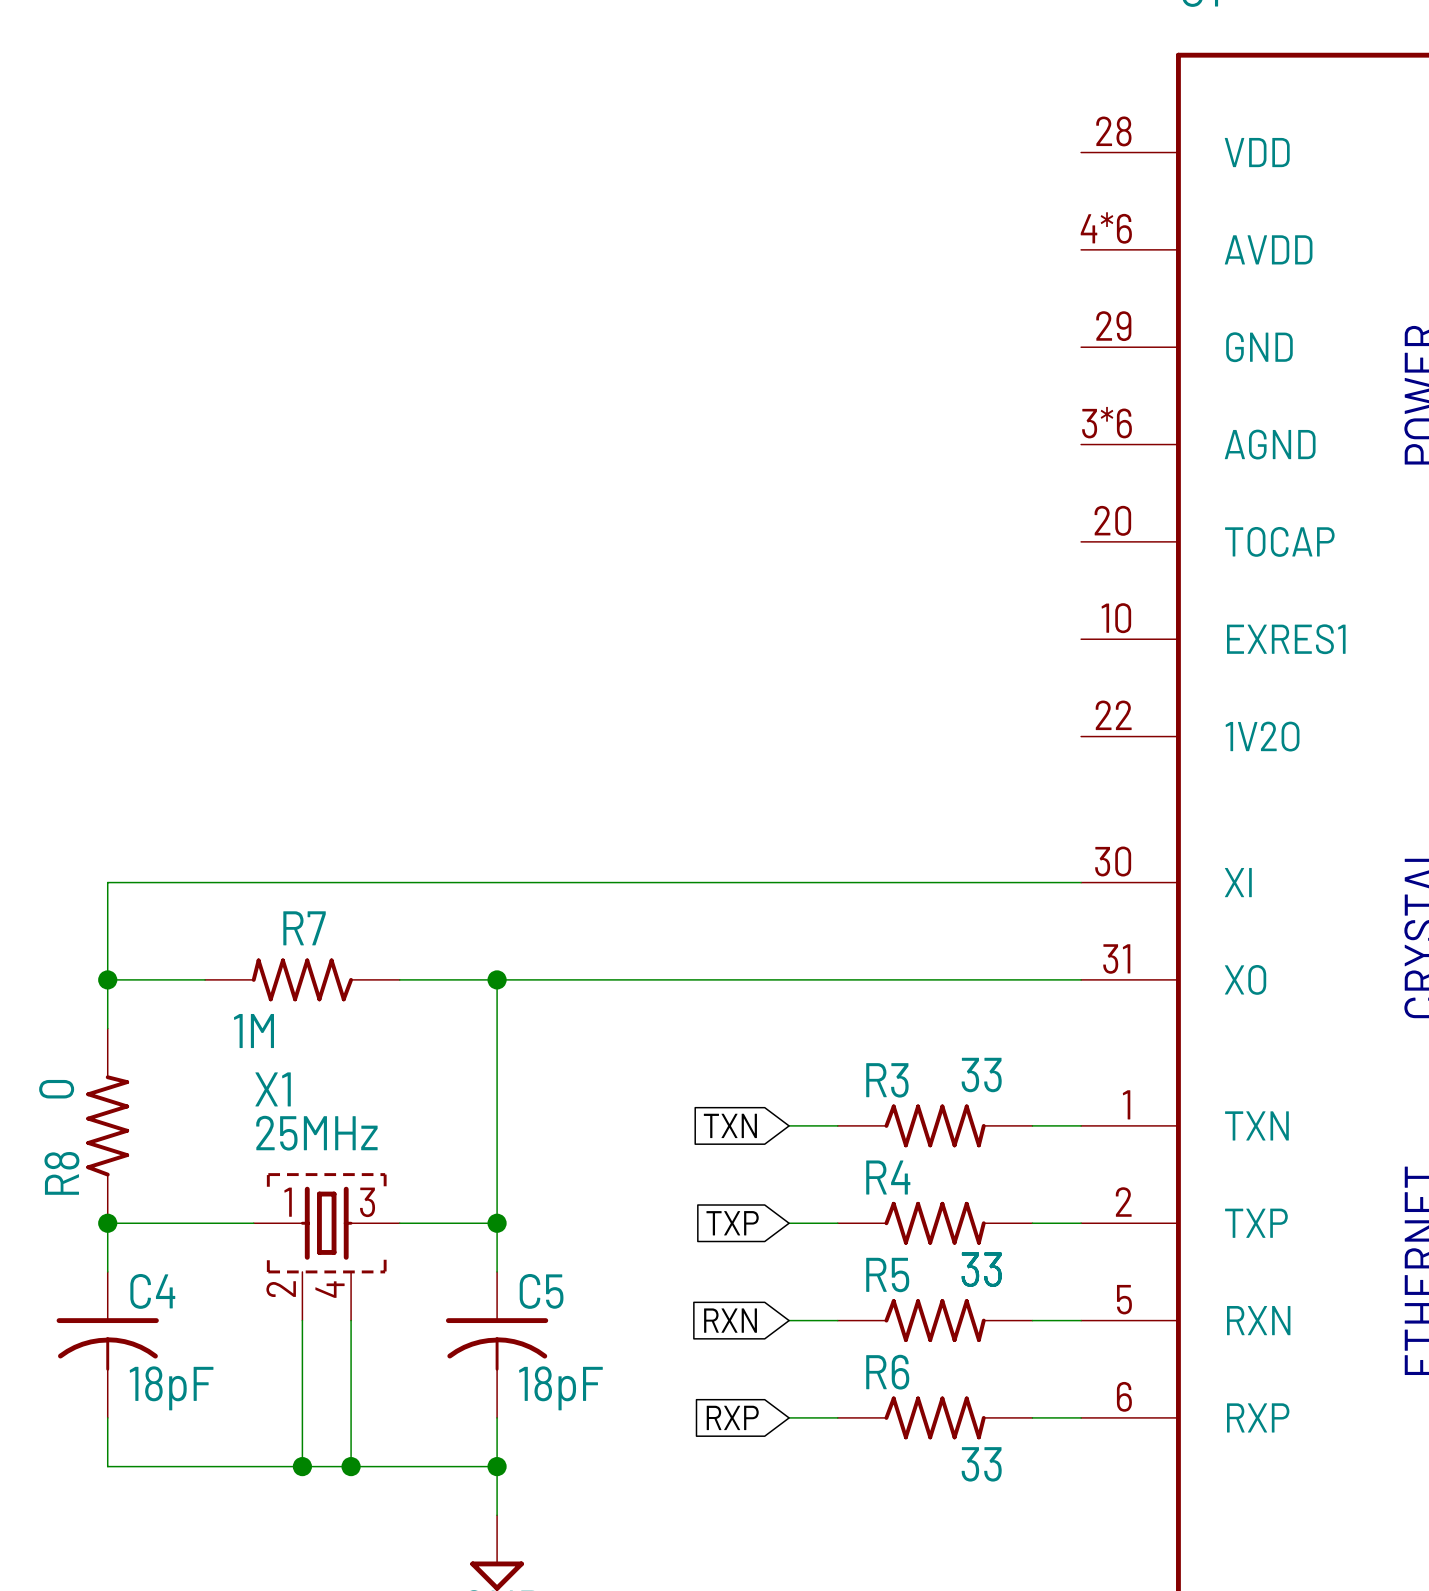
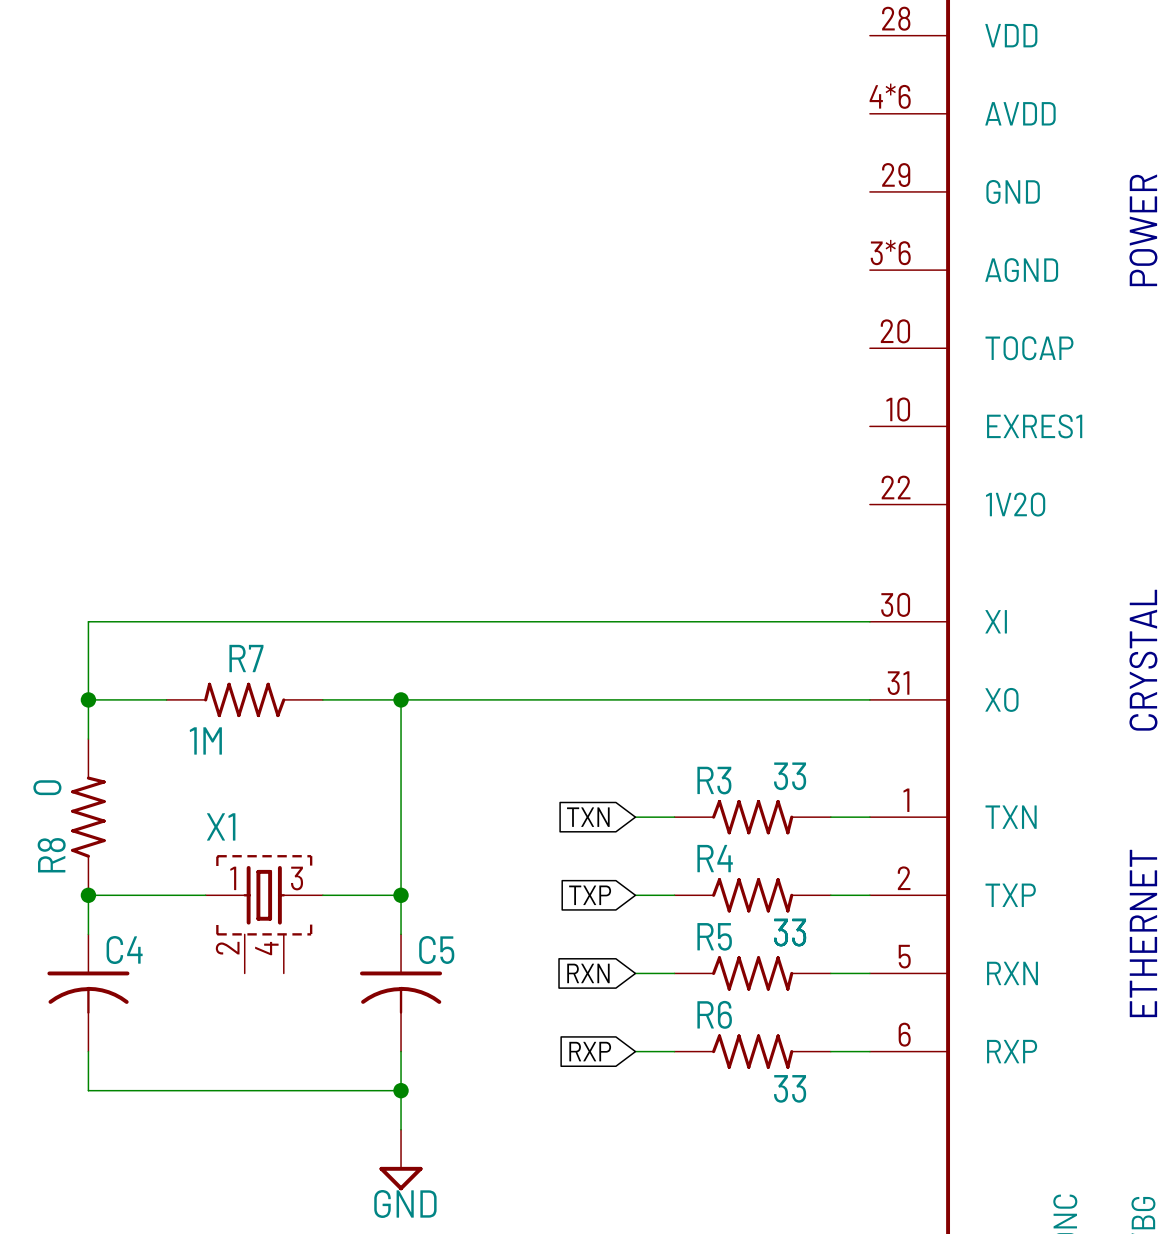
X1 name position: X1 (273, 1089) -> X1 (221, 826)
X1 value: 25MHz (316, 1133) -> none
wire: (302, 1320) (302, 1466) -> none
wire: (351, 1320) (351, 1466) -> none
C4 value: 18pF (171, 1388) -> none
C5 value: 18pF (560, 1388) -> none
junction: (302, 1466) -> none
junction: (351, 1466) -> none

